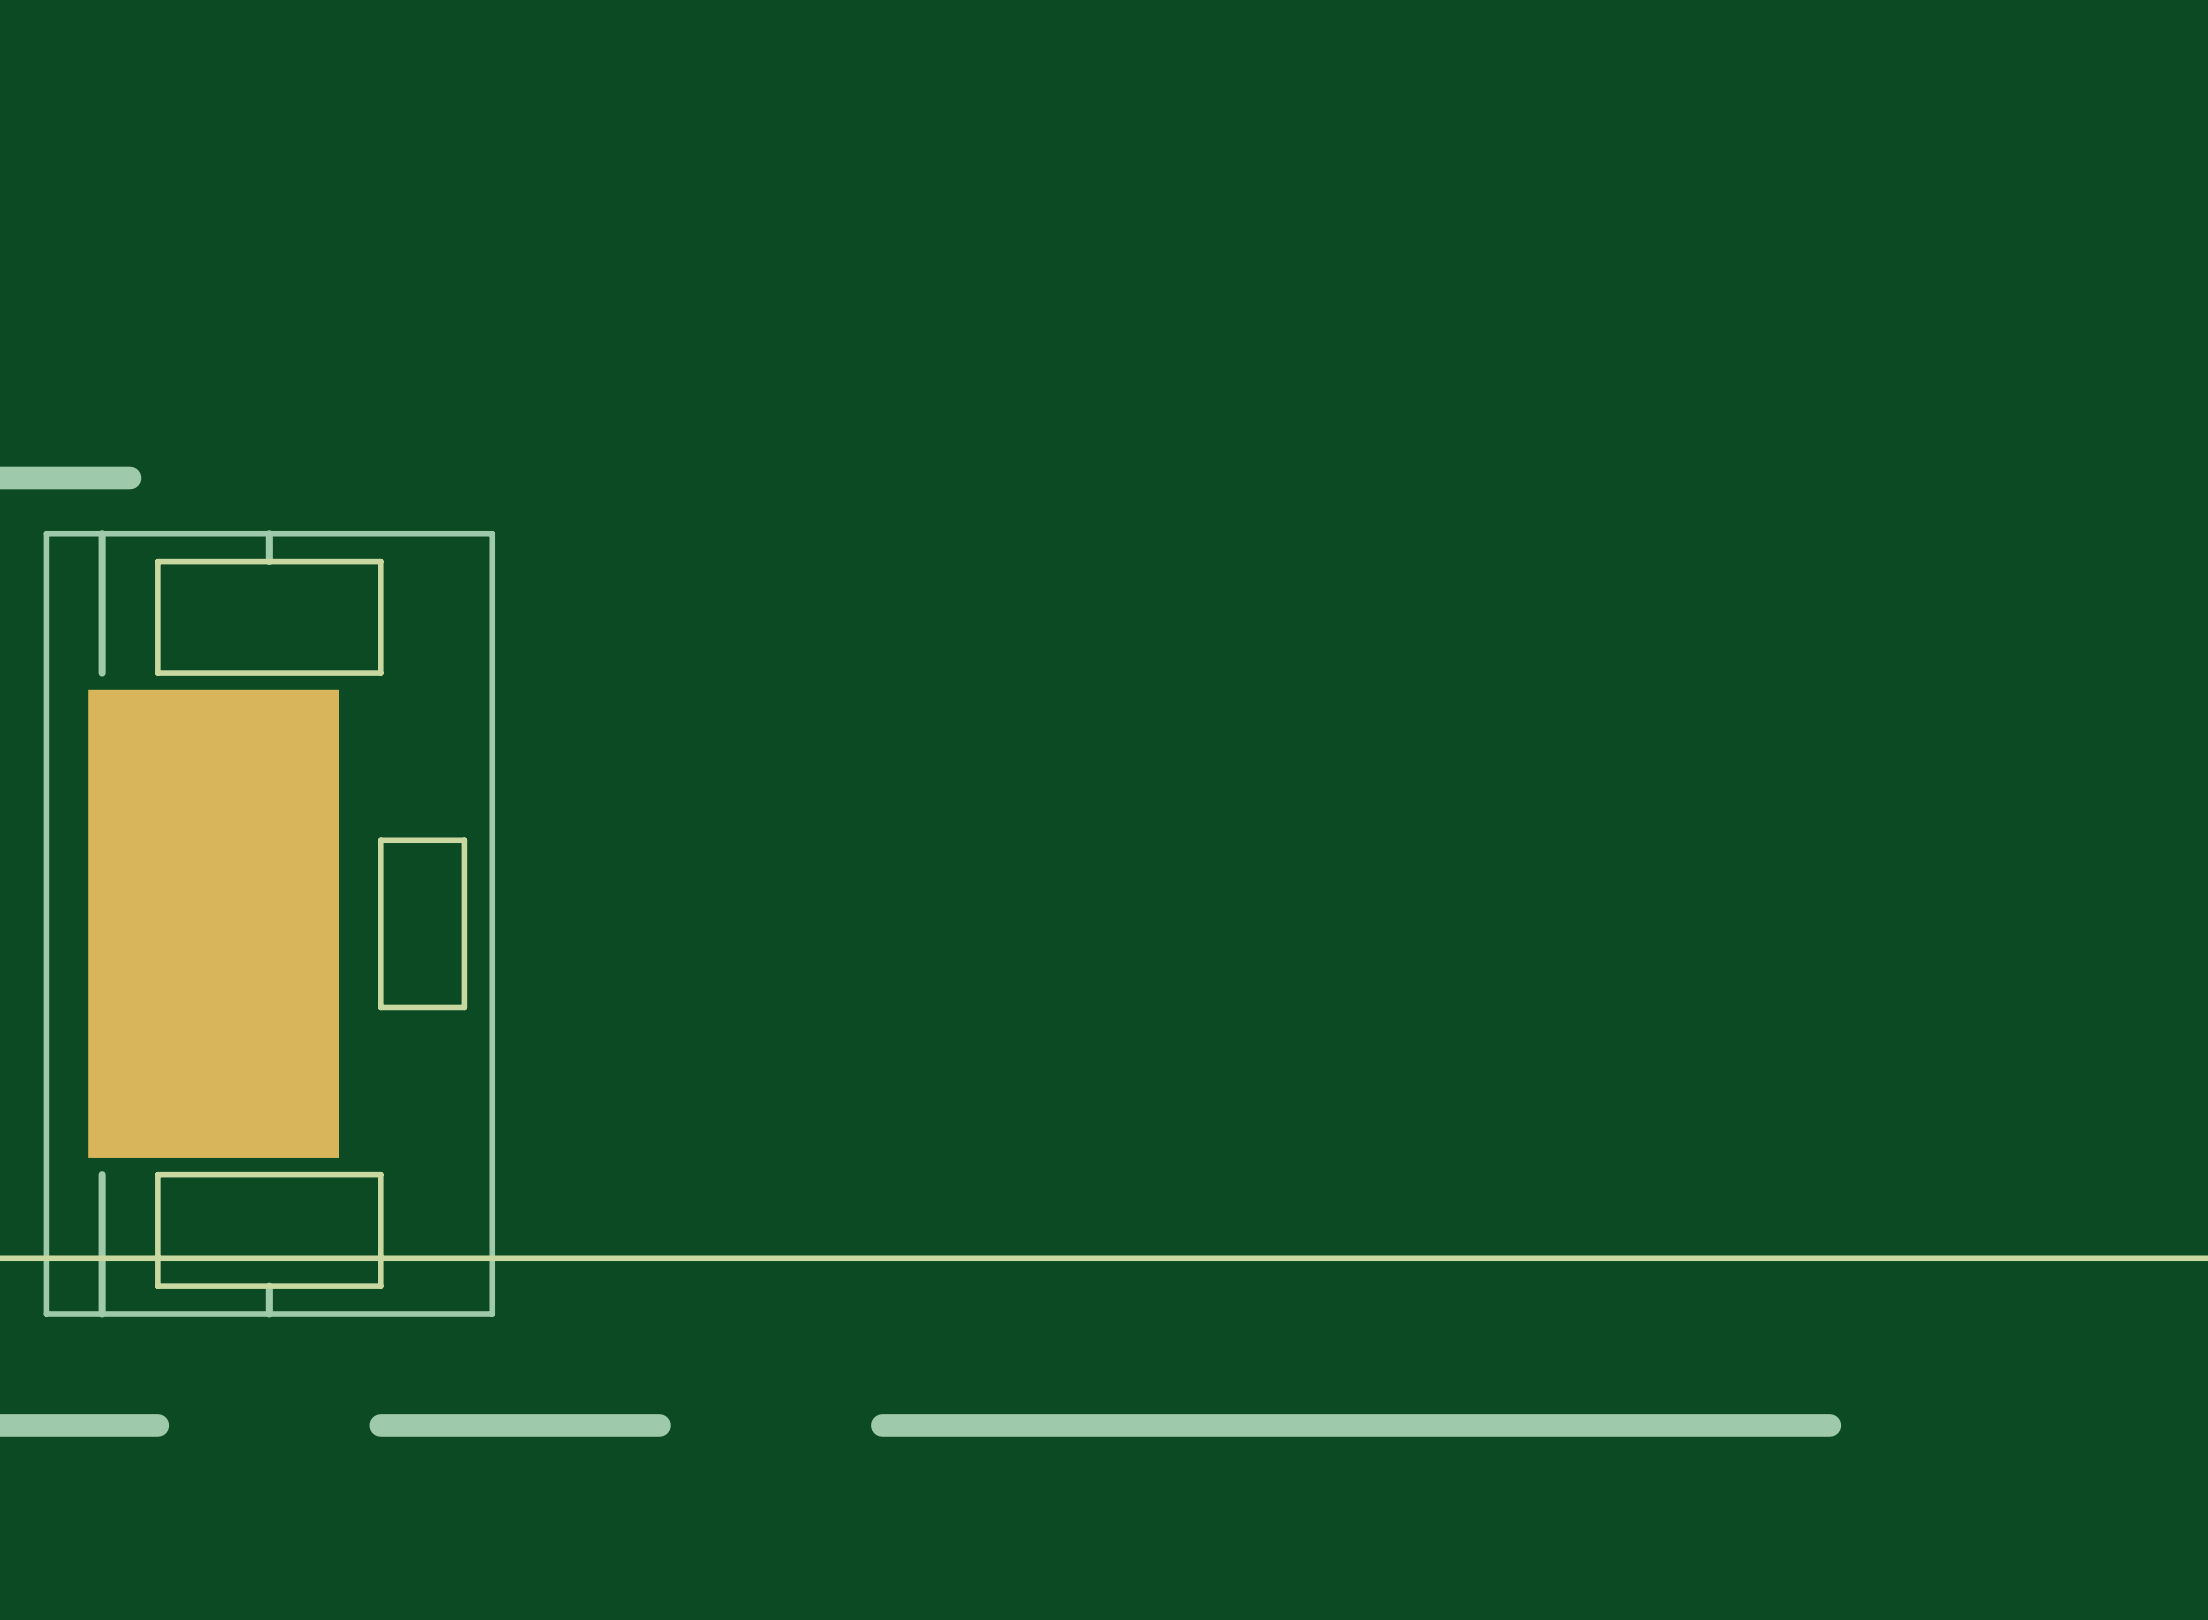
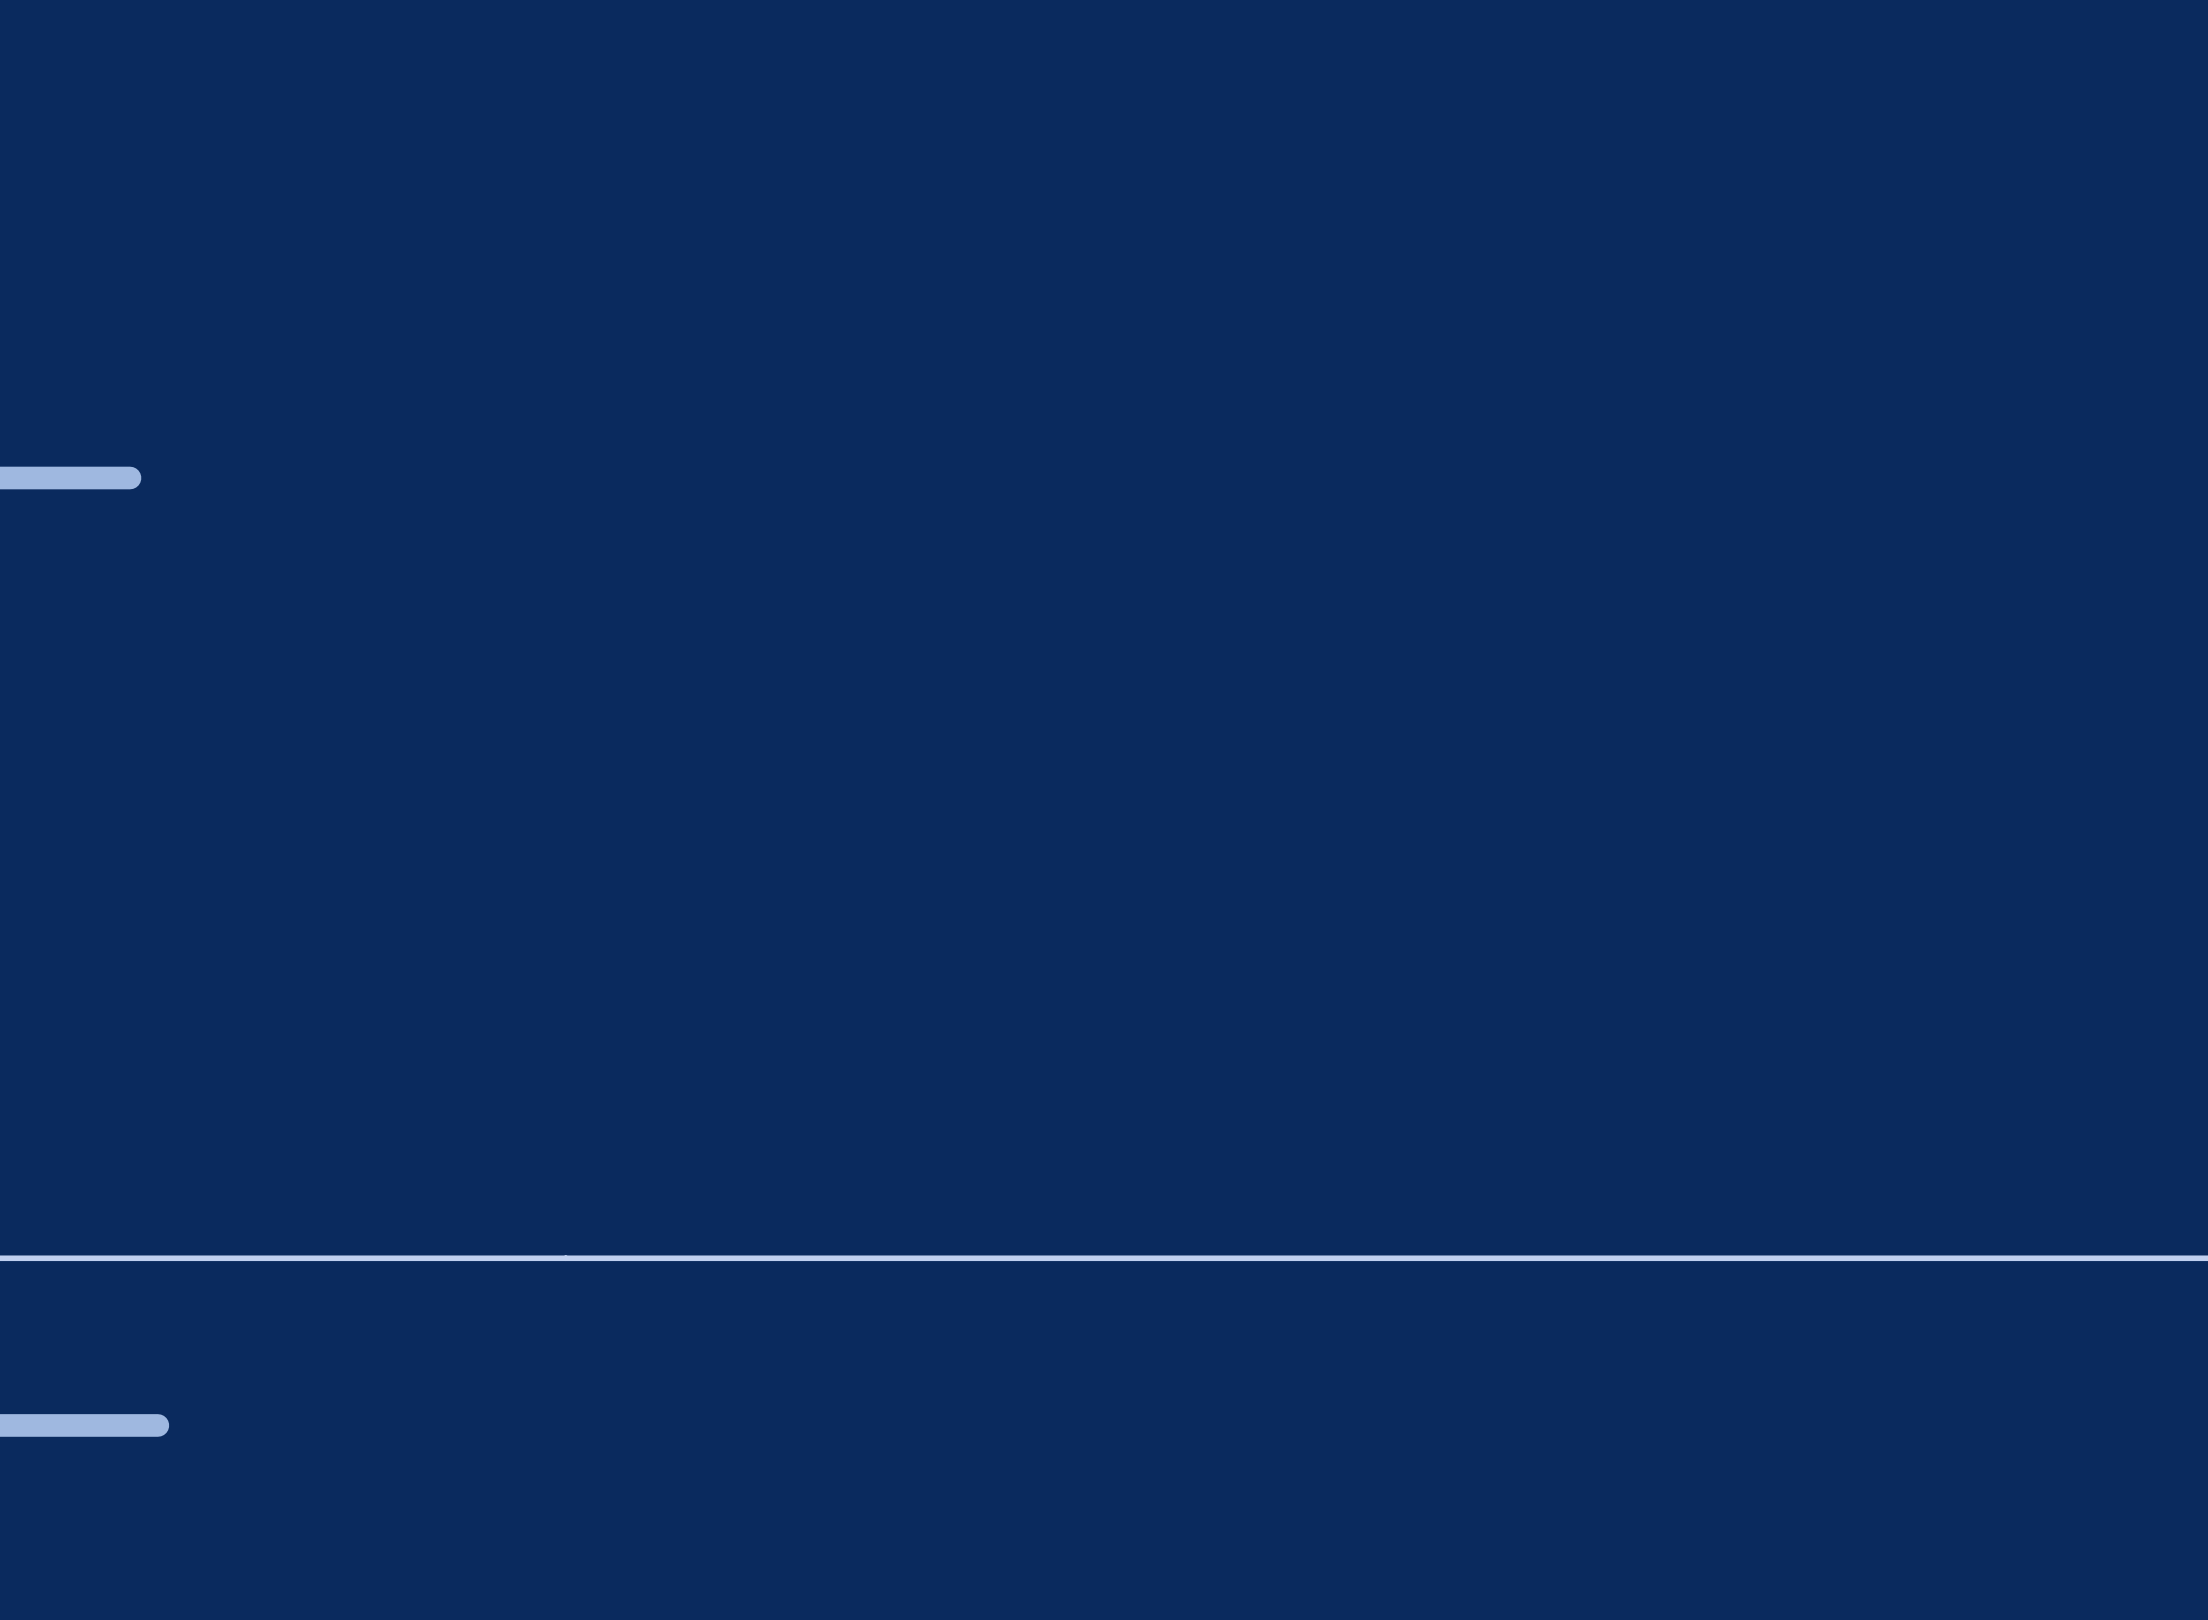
part: (269, 923) -> none
line: (380, 1425) (659, 1425) -> none
line: (882, 1425) (1829, 1425) -> none

